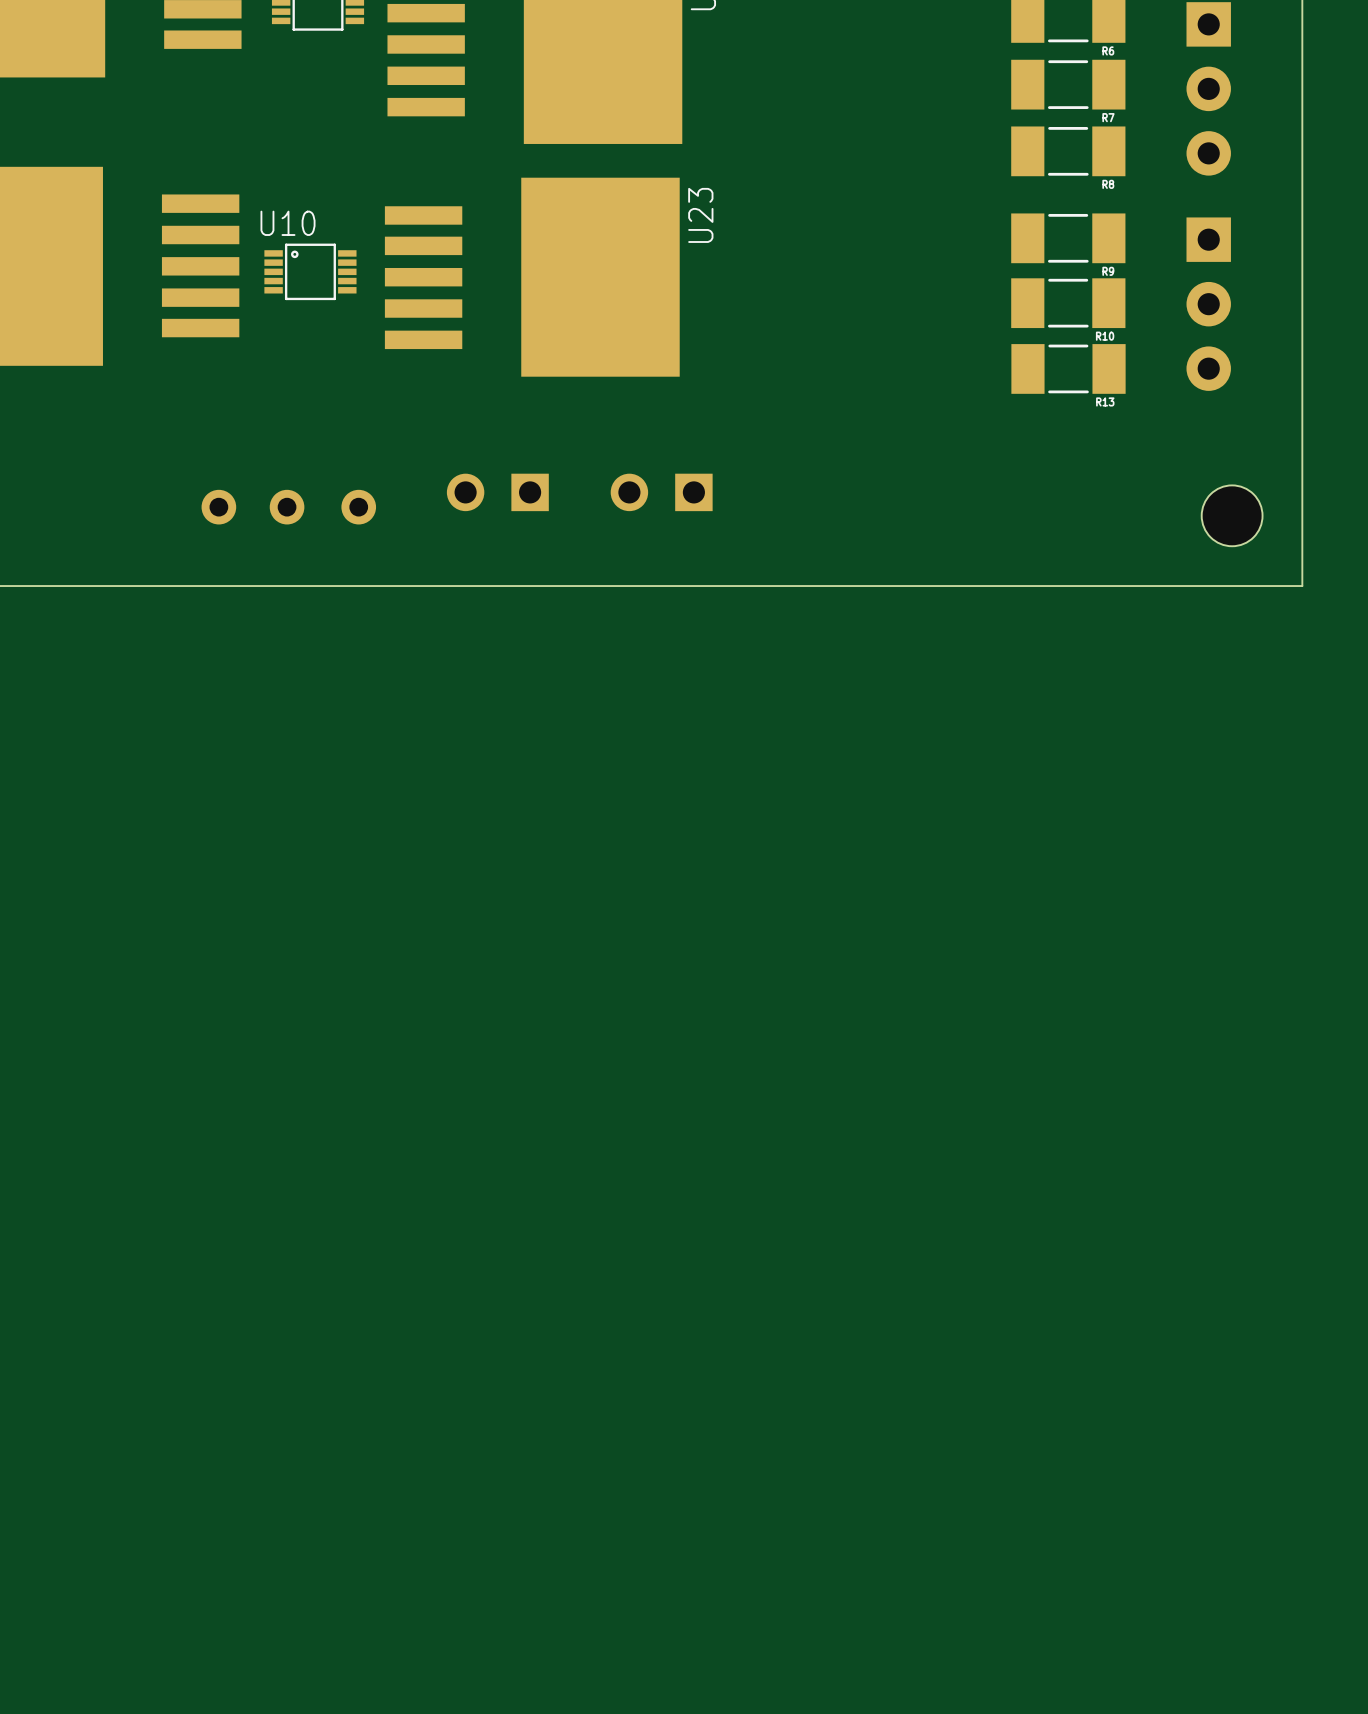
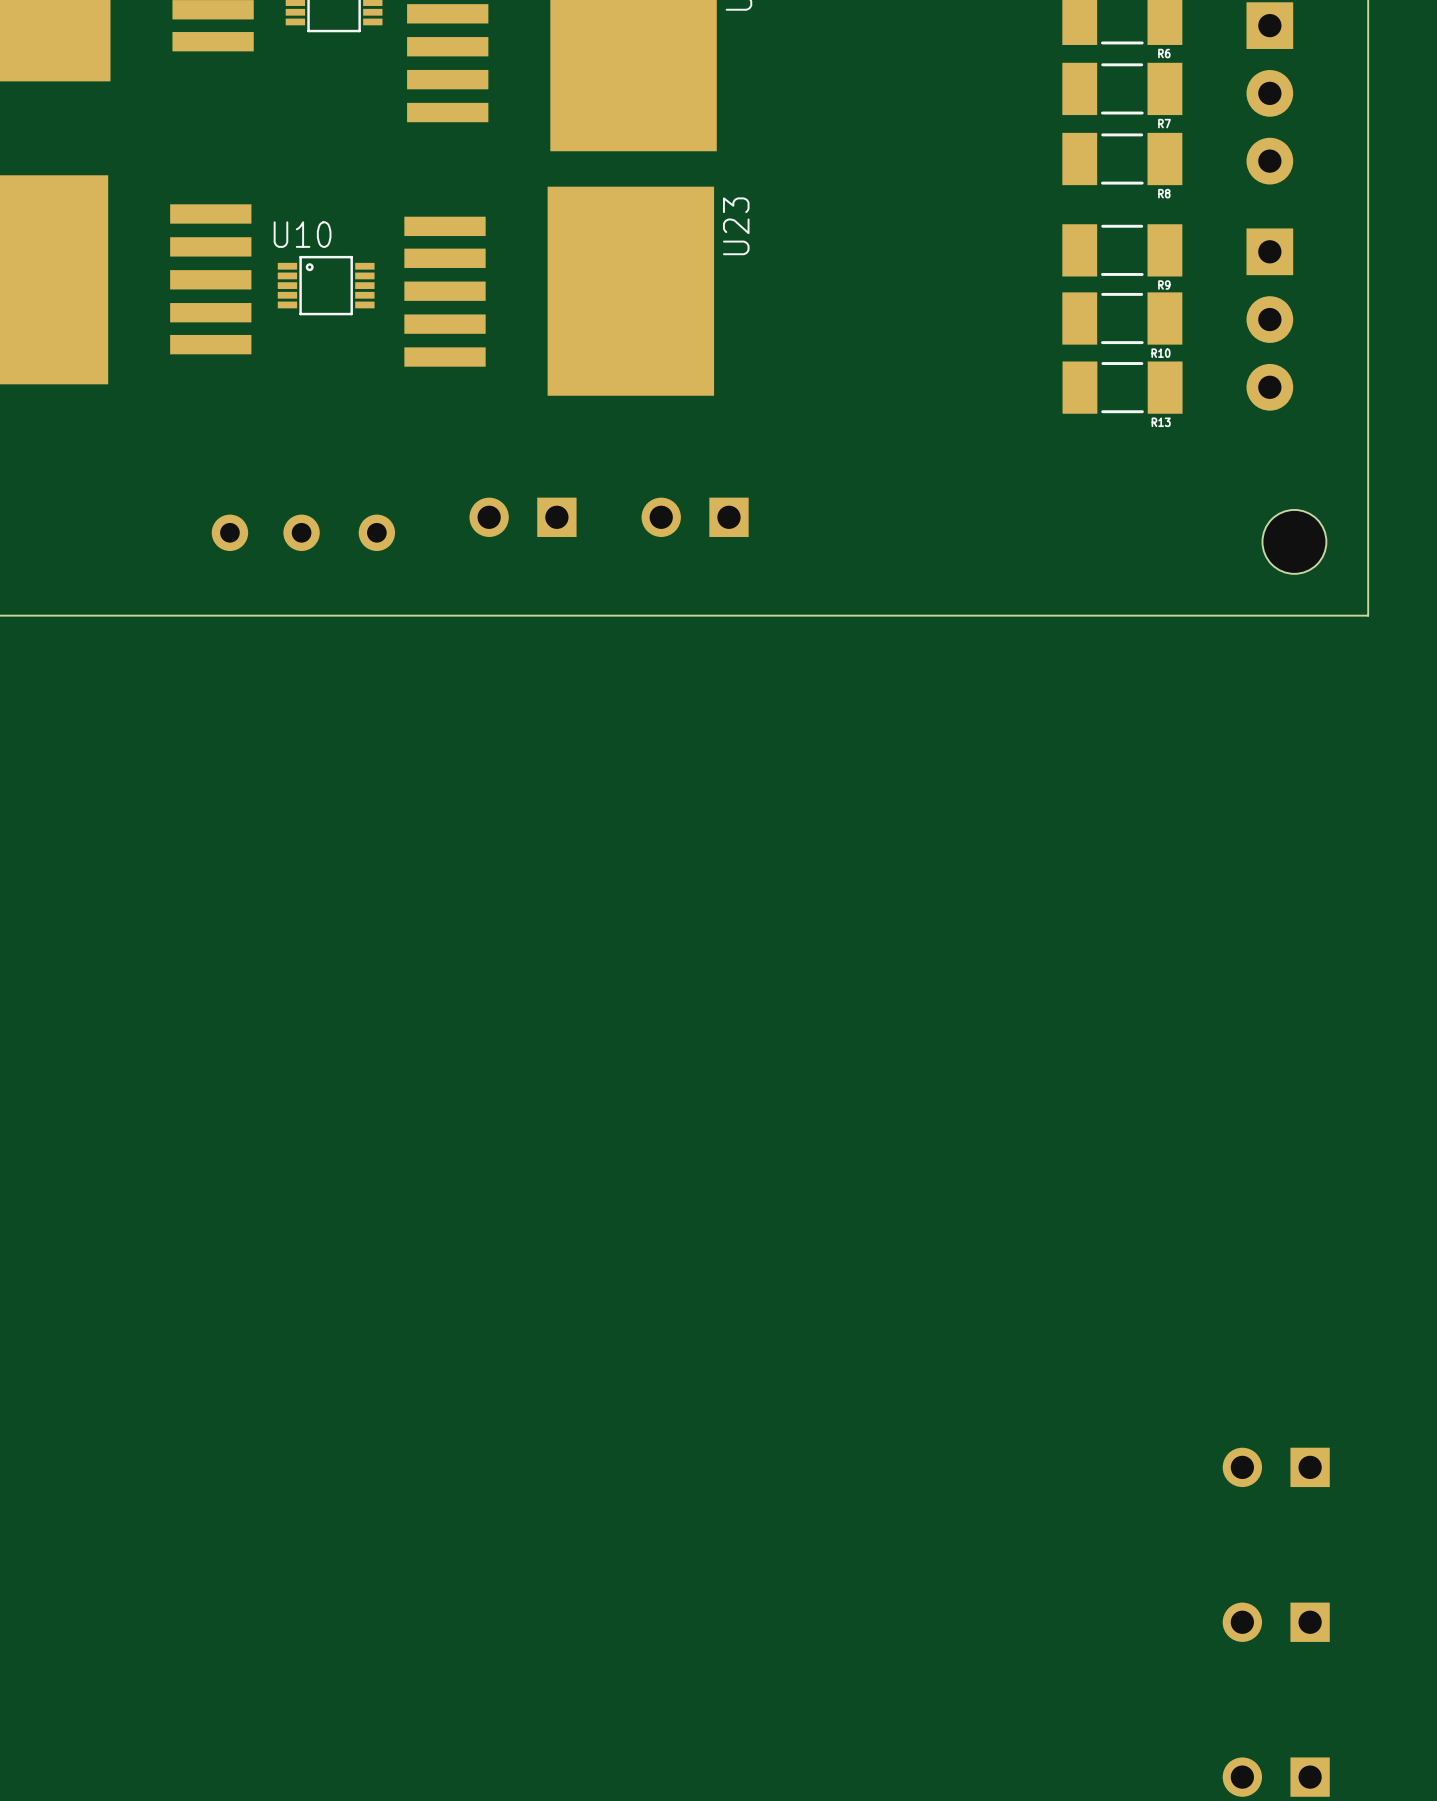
part: none -> (1276, 1467)
part: none -> (1276, 1622)
part: none -> (1276, 1777)

